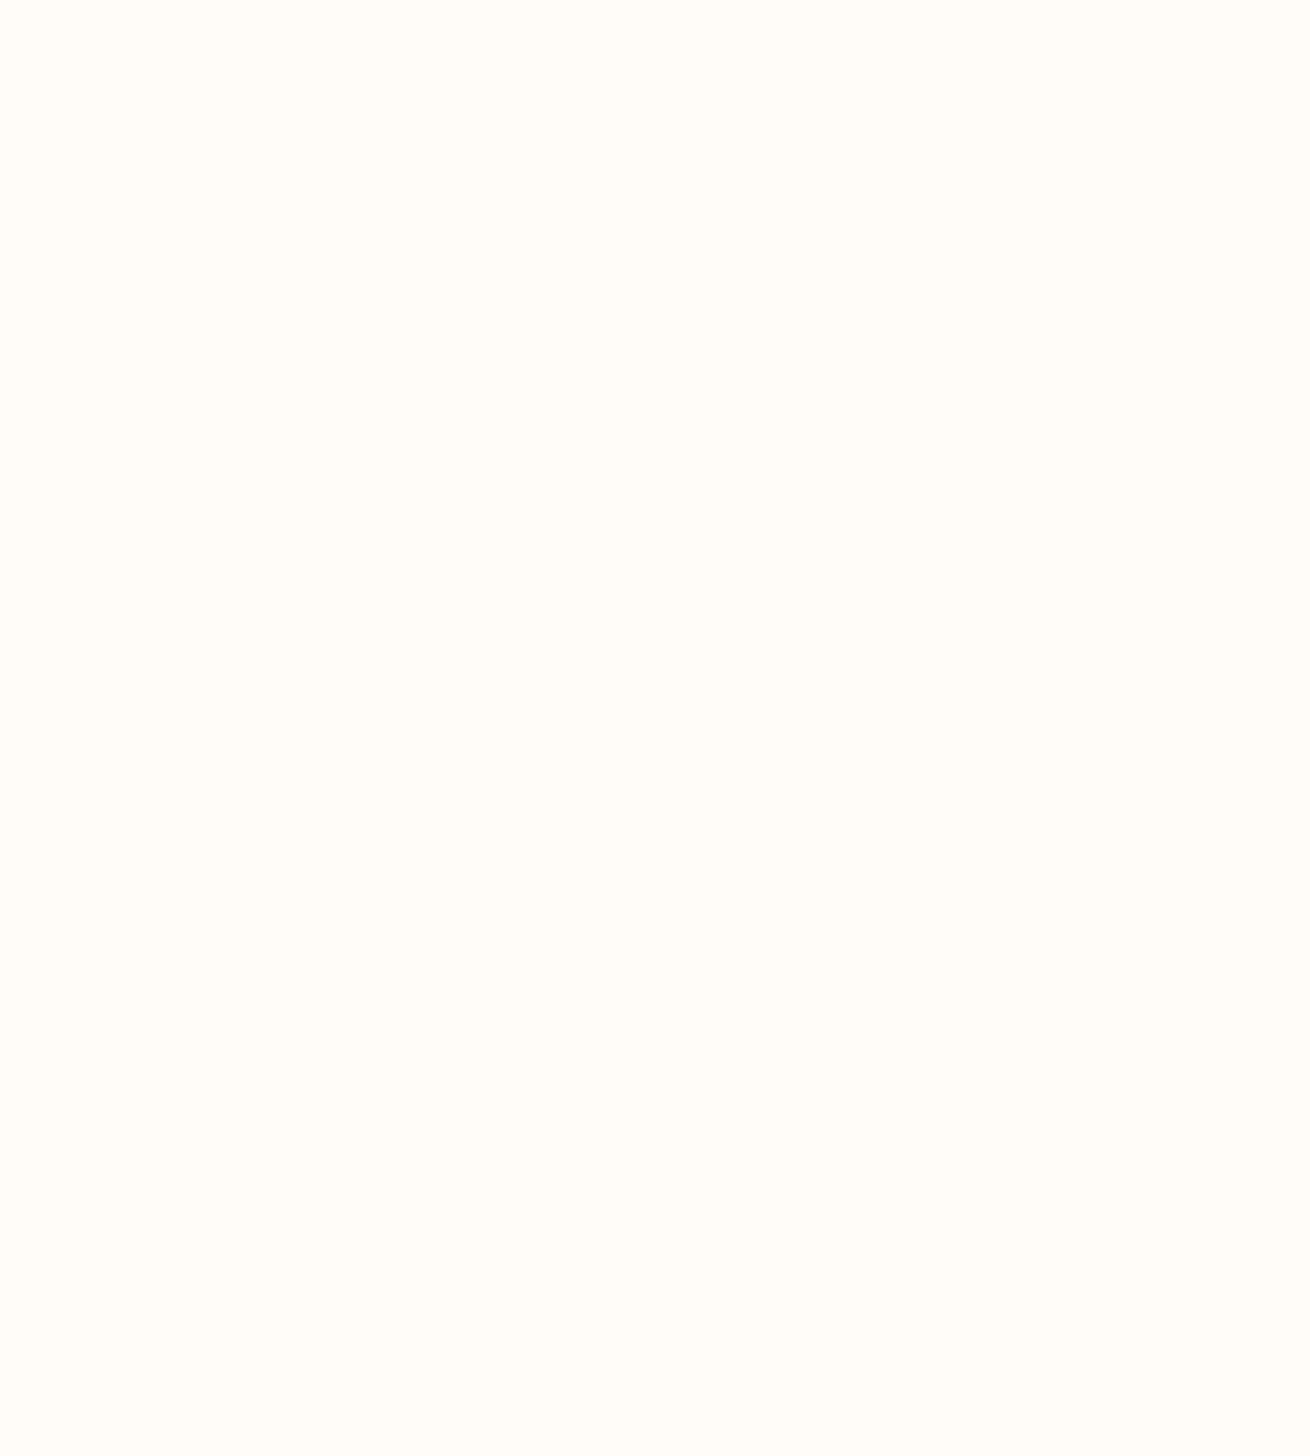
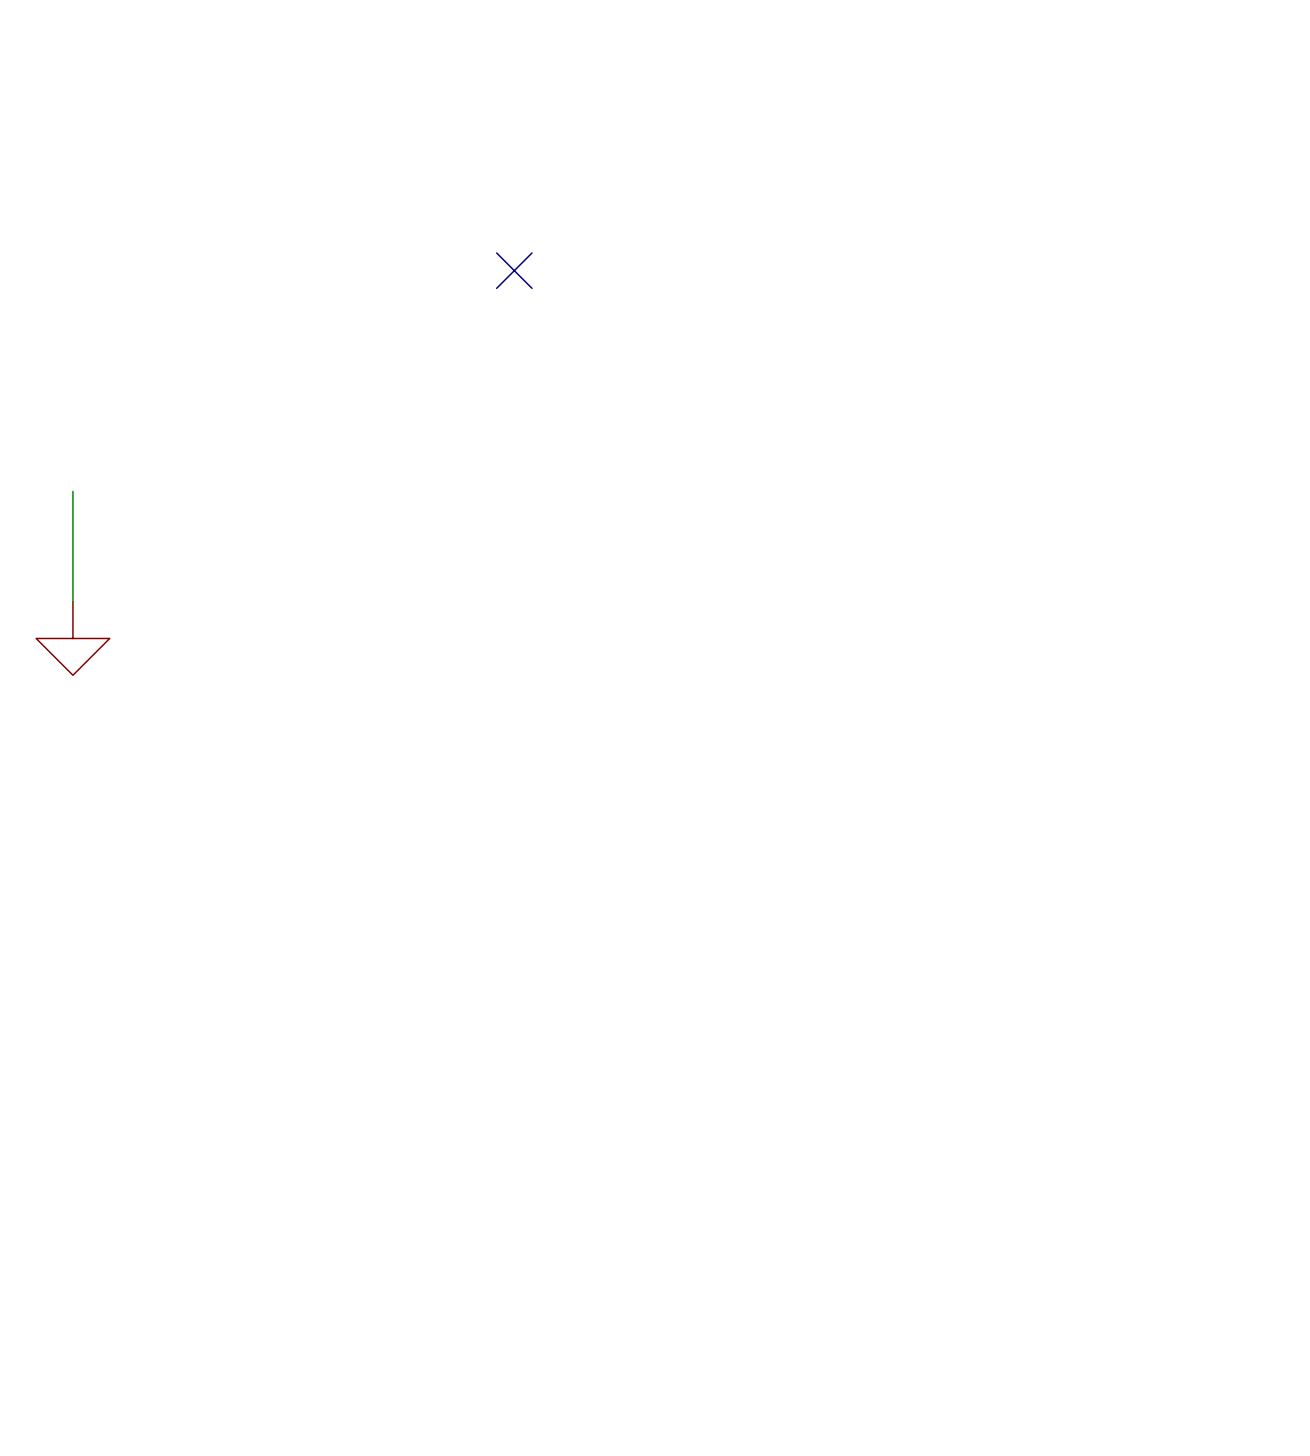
no-connect mark: none -> (514, 270)
wire: none -> (72, 491) (72, 601)
power symbol: none -> (72, 638)

